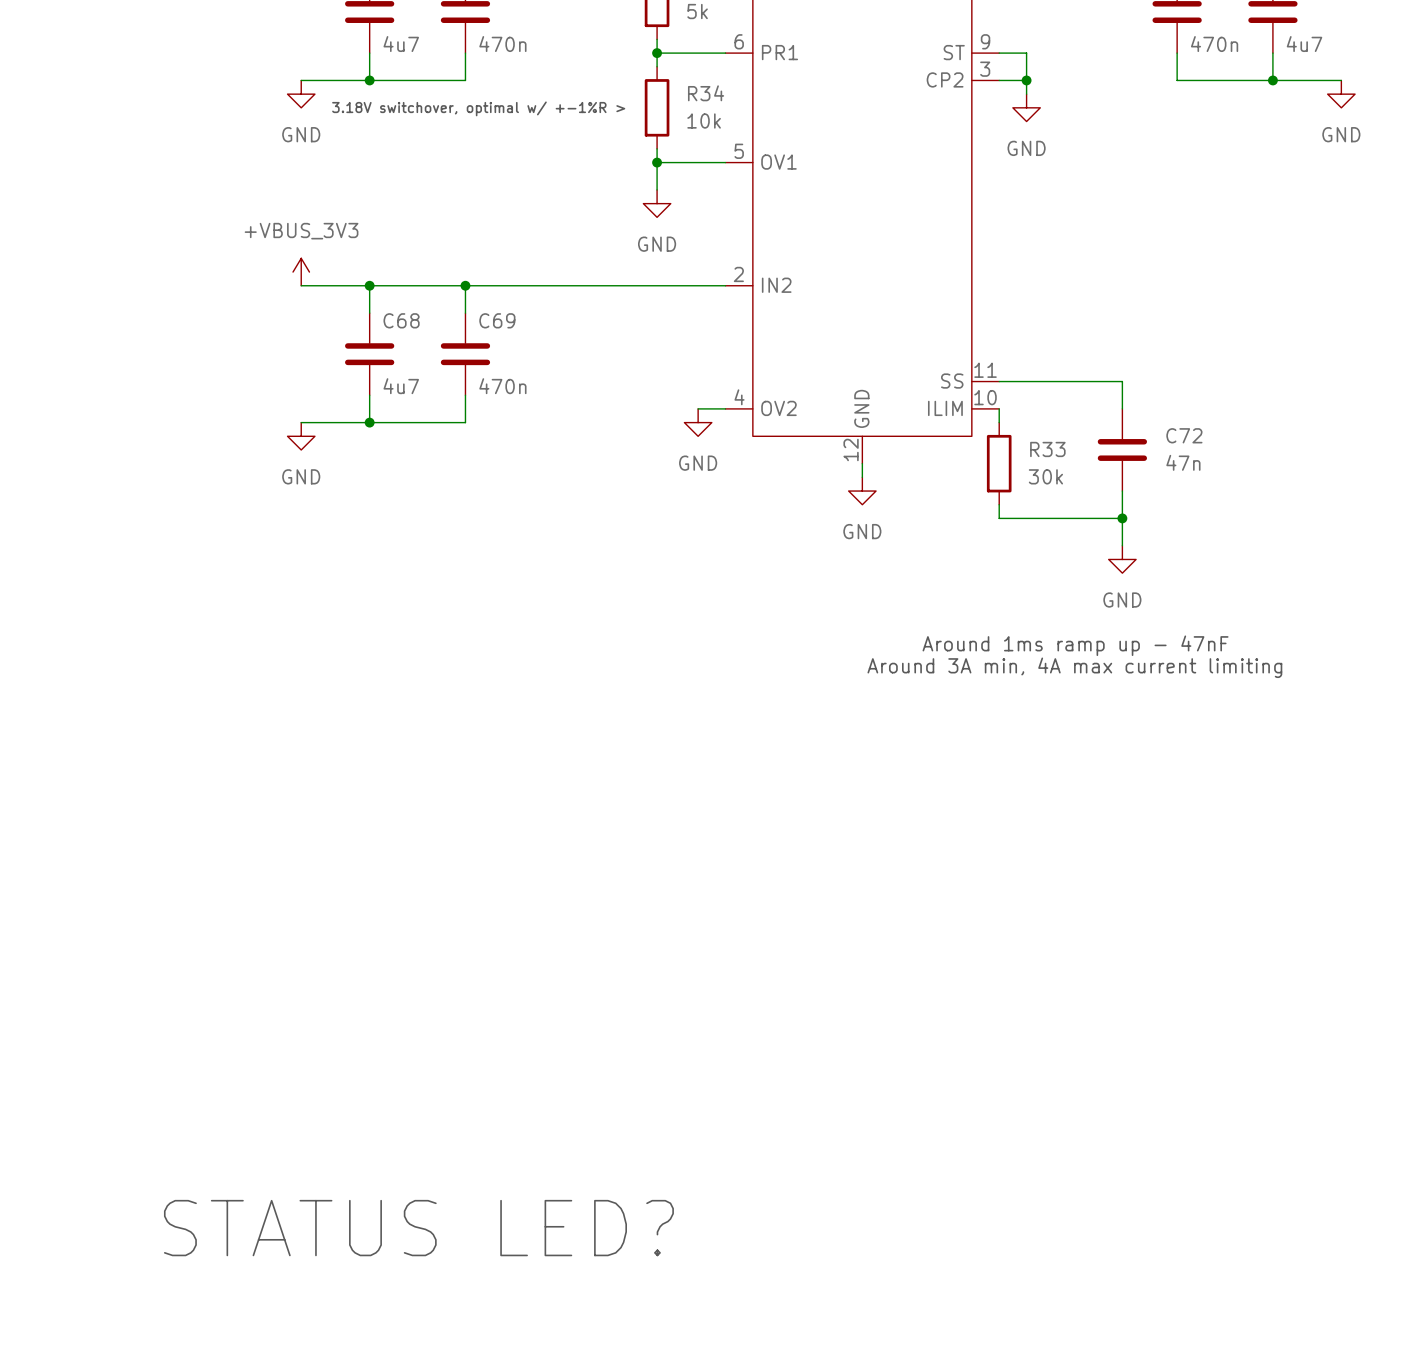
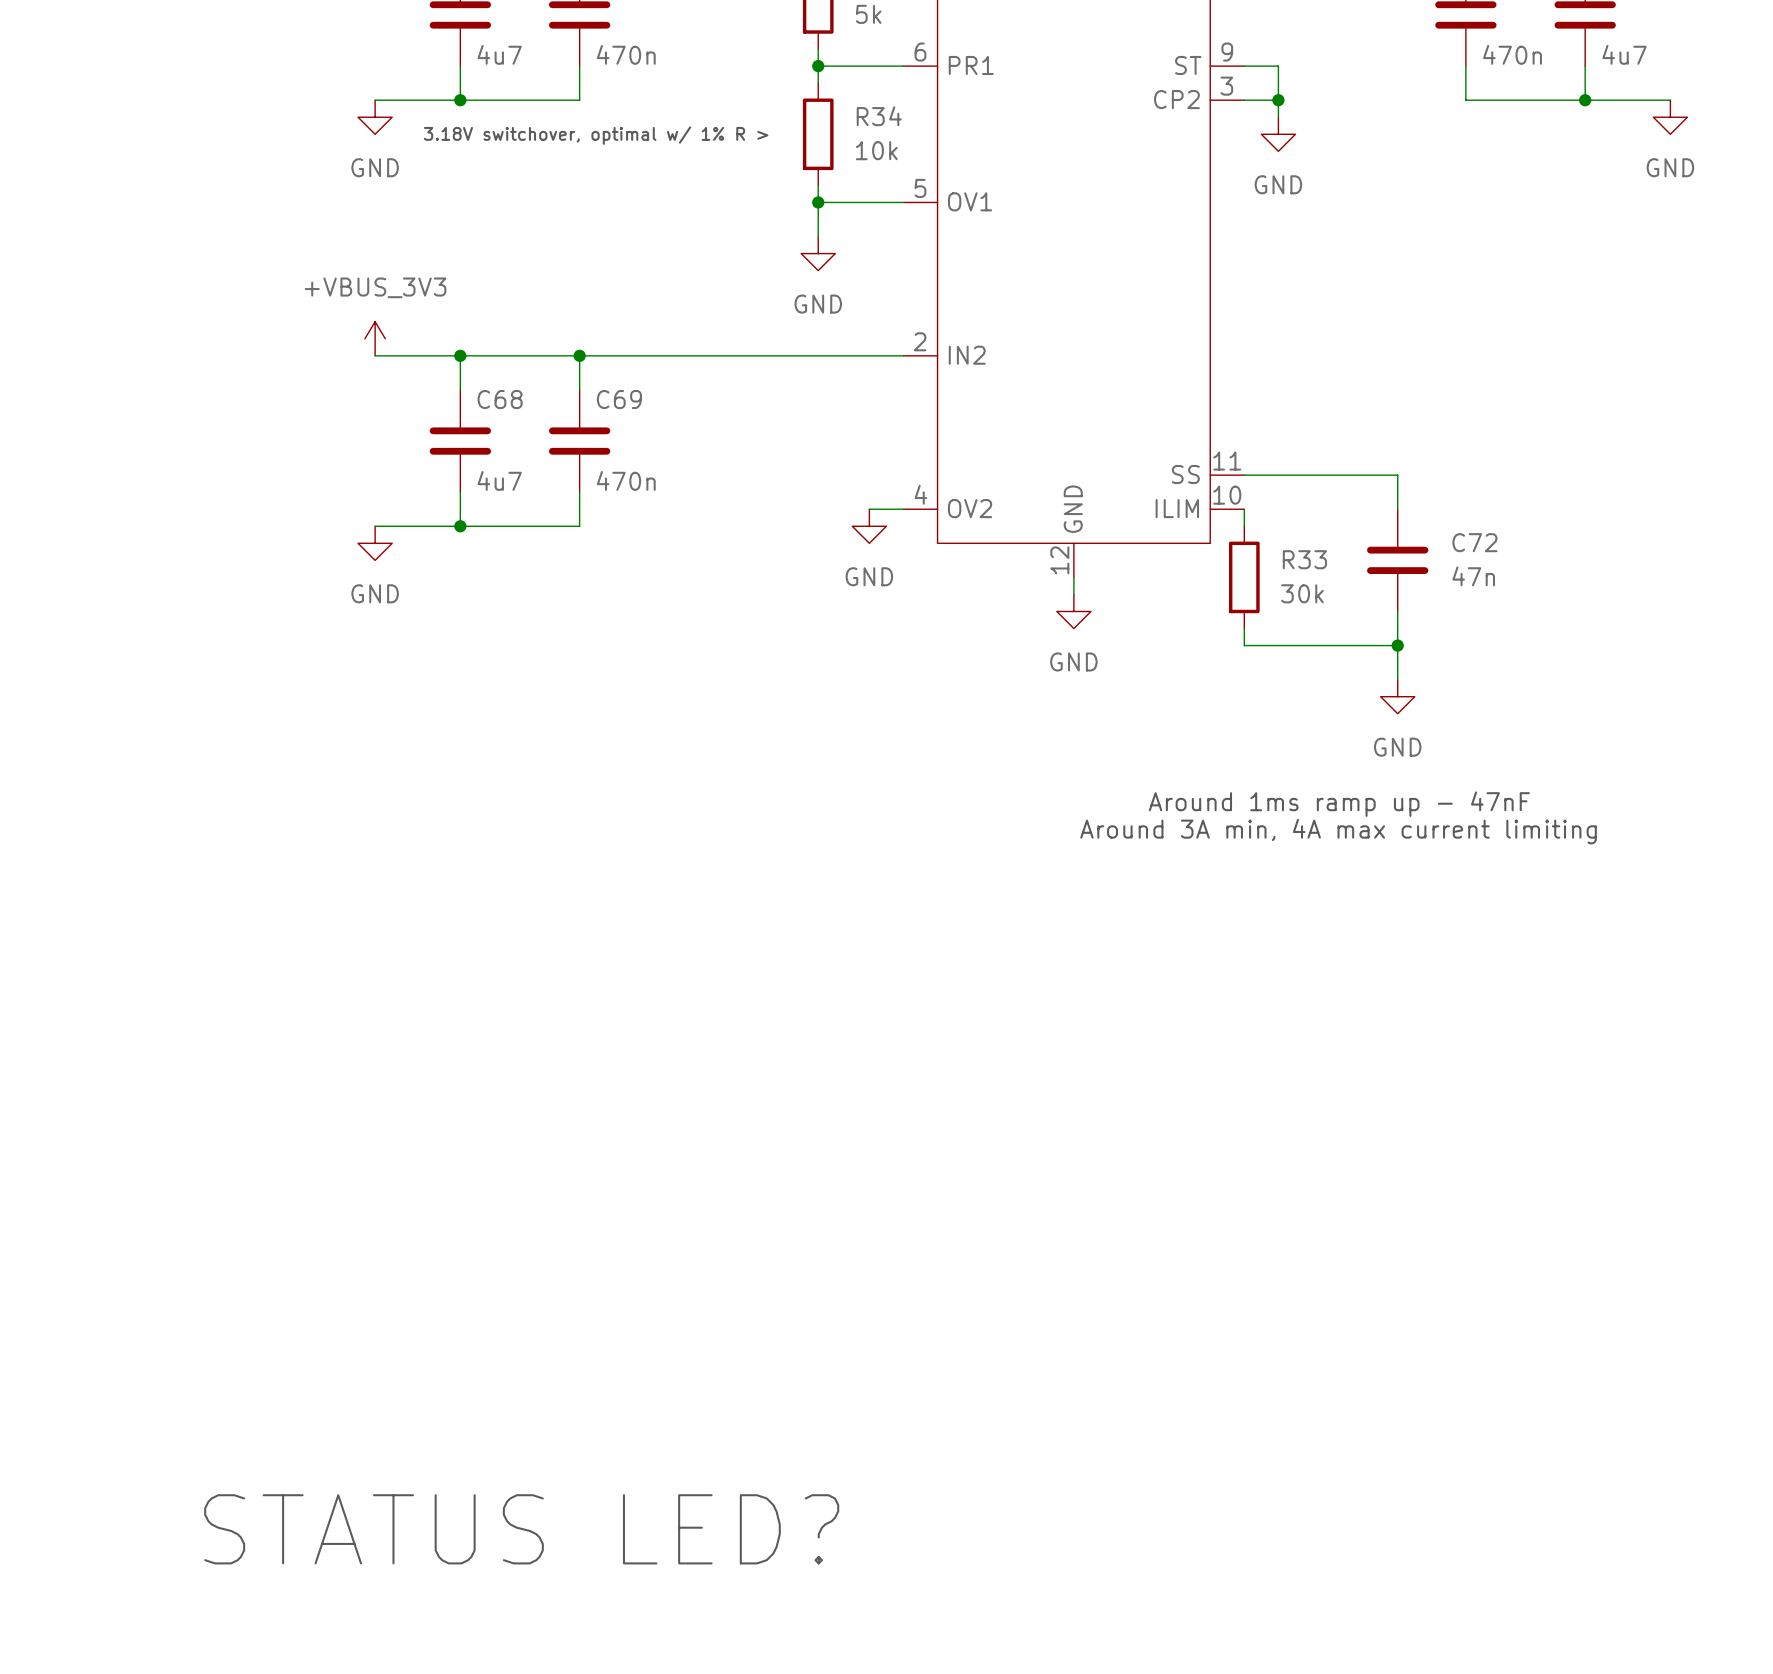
text: 3.18V switchover, optimal w/ +-1%R > (478, 108) -> 3.18V switchover, optimal w/ 1% R > (596, 135)

